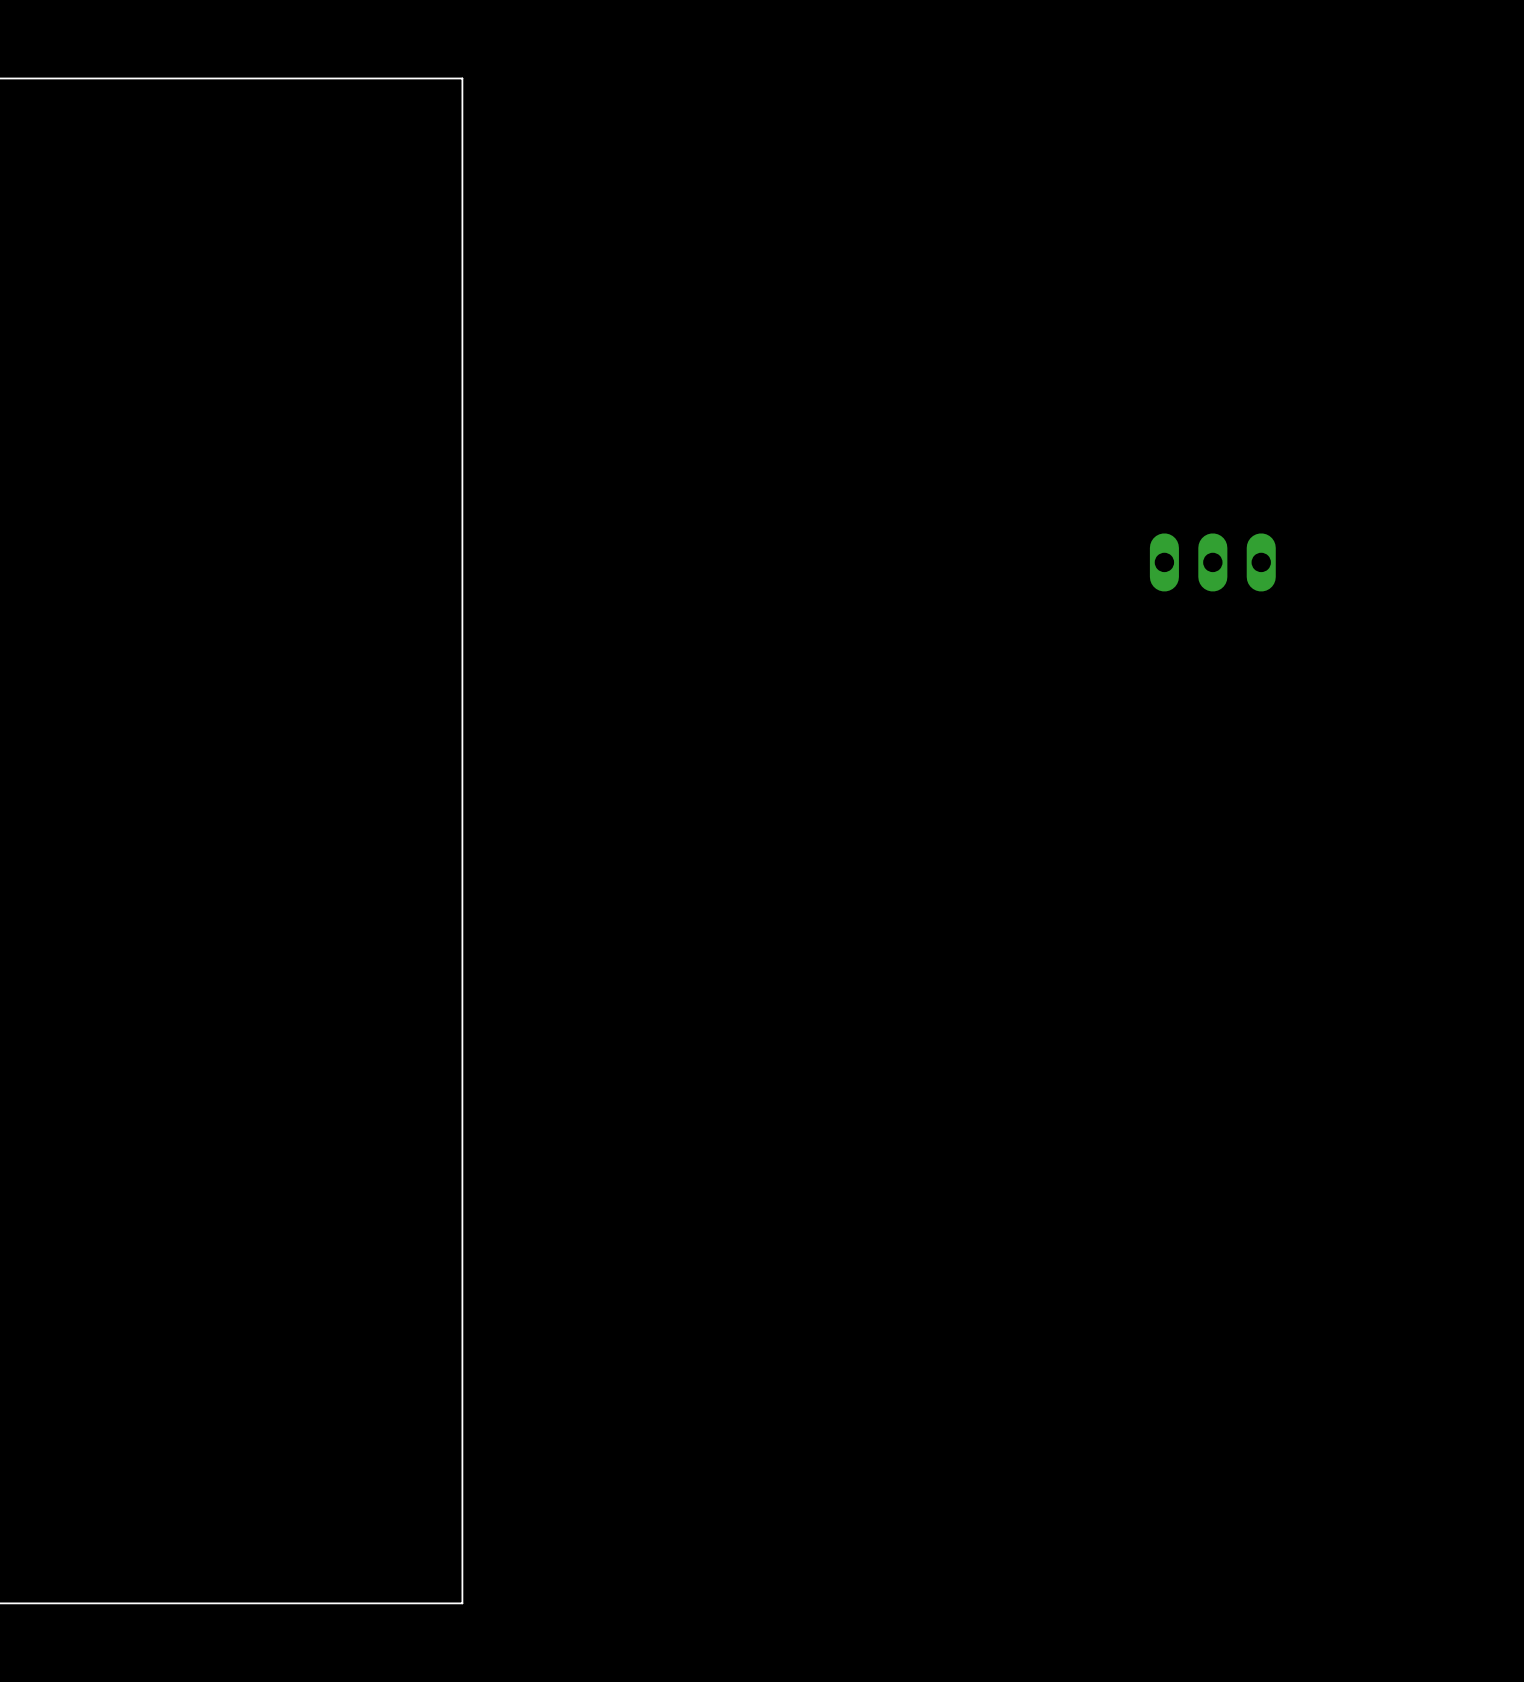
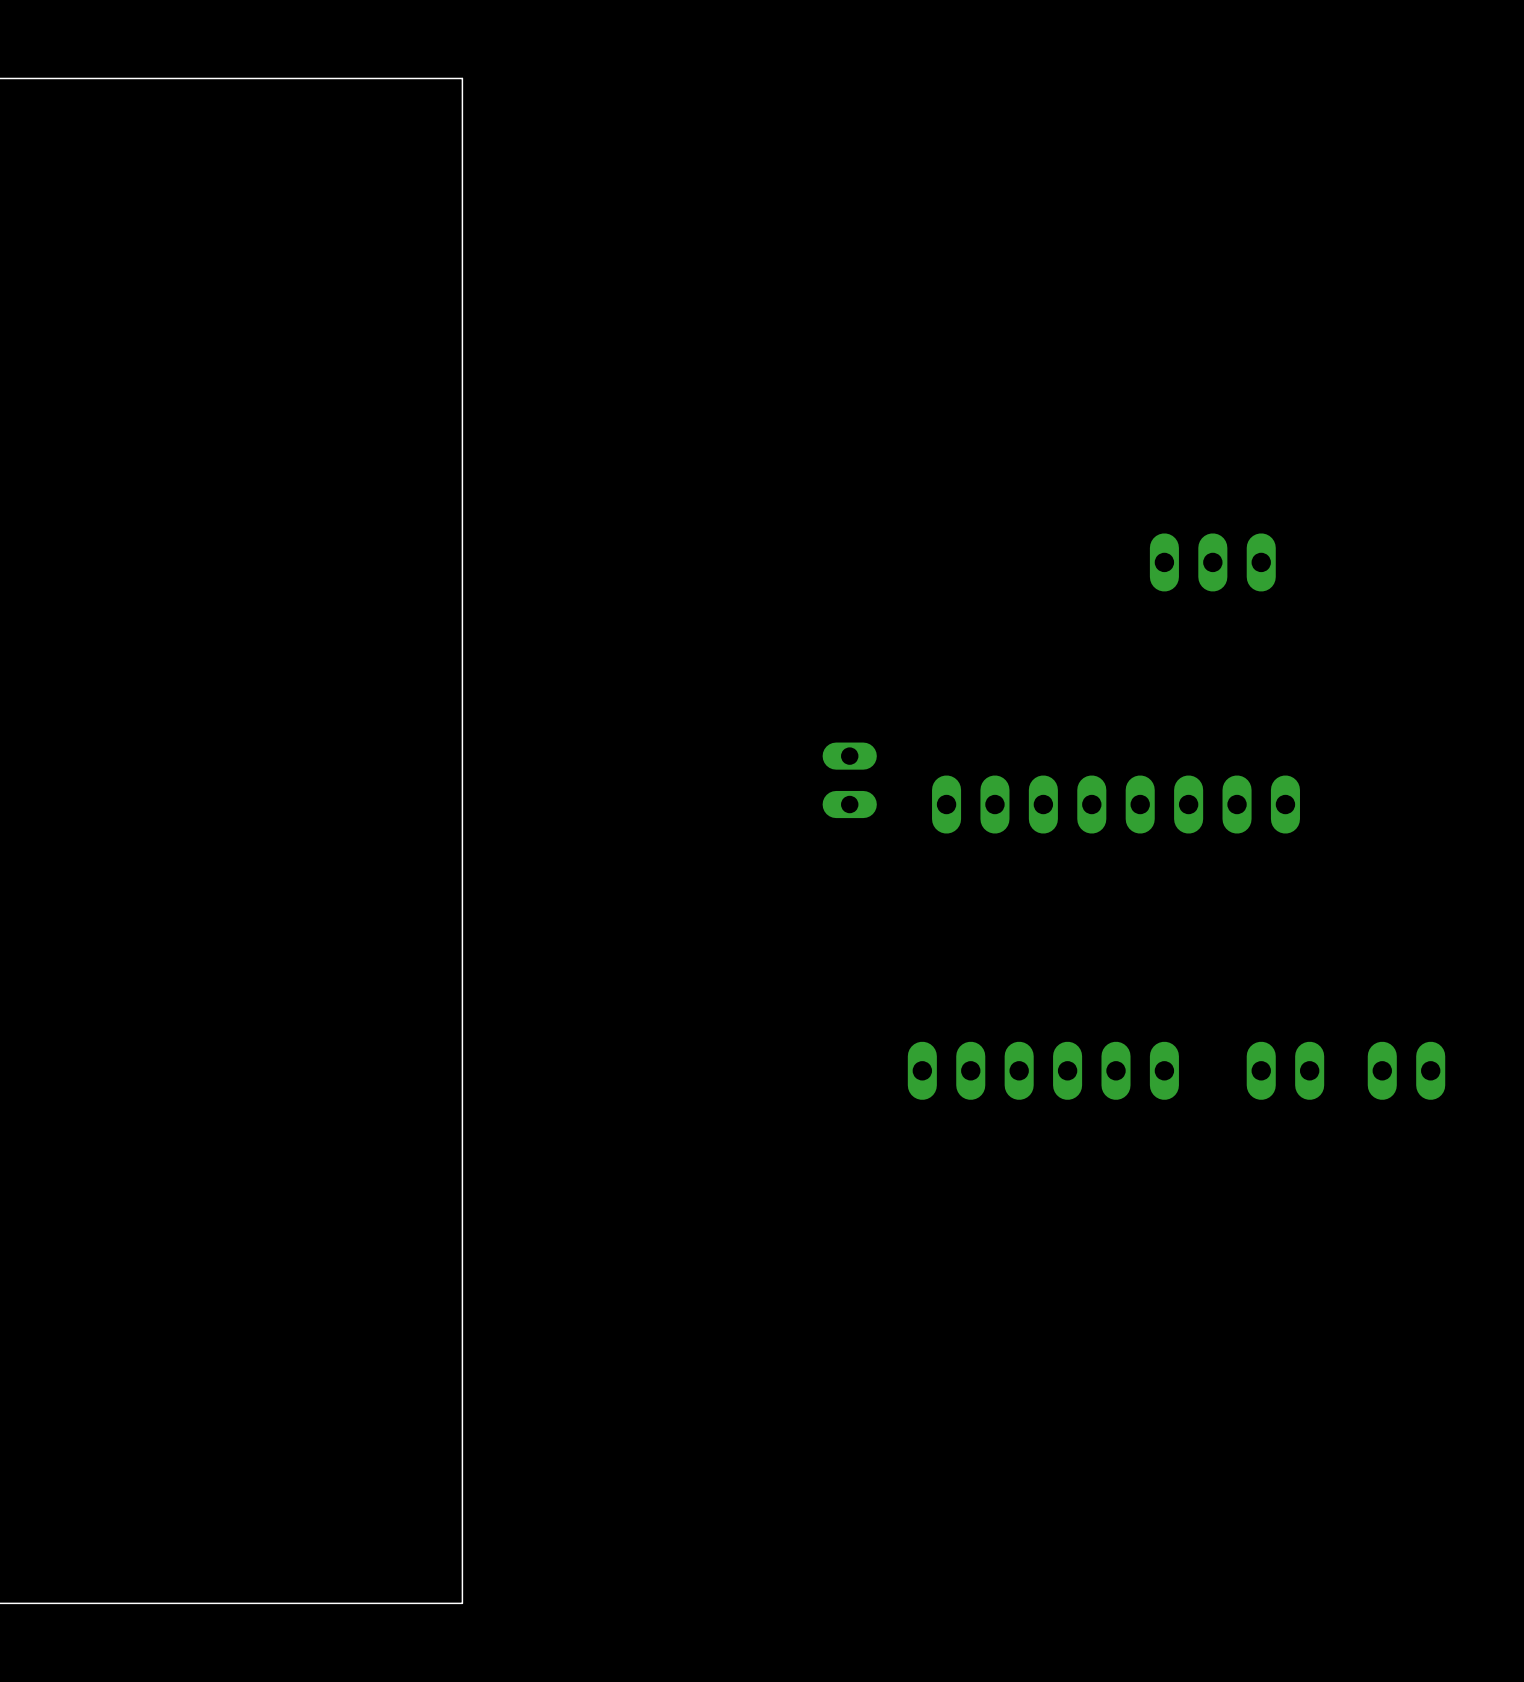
part: none -> (849, 780)
part: none -> (1116, 804)
part: none -> (1043, 1070)
part: none -> (1285, 1070)
part: none -> (1406, 1070)

